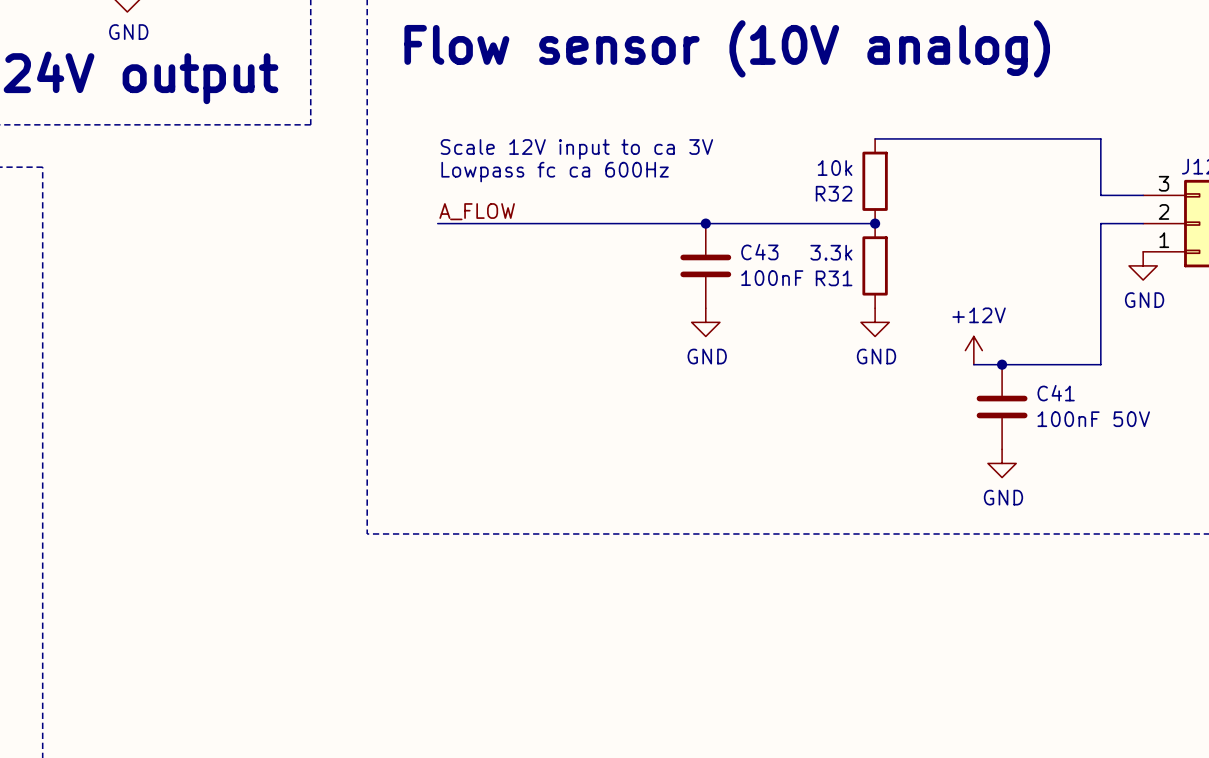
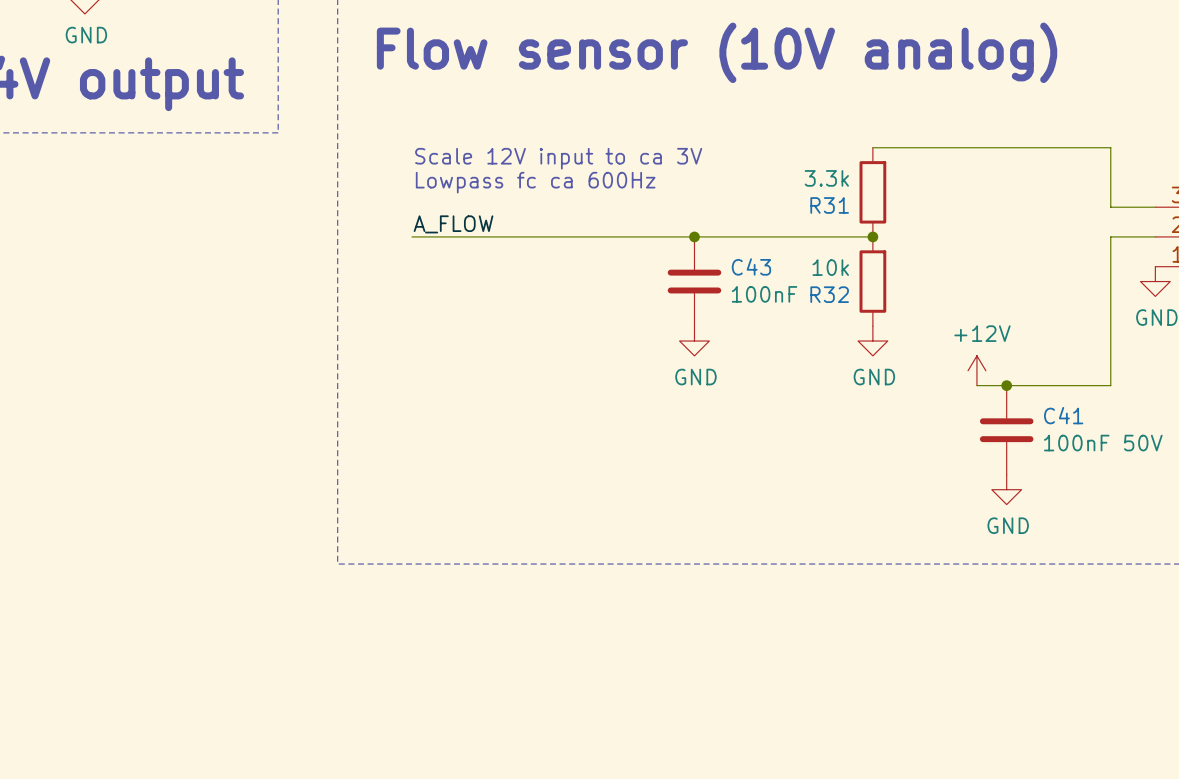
R32 value: 10k (835, 168) -> 3.3k (826, 178)
R32 name: R32 (834, 193) -> R31 (829, 205)
R31 value: 3.3k (831, 252) -> 10k (830, 267)
R31 name: R31 (834, 278) -> R32 (829, 294)

